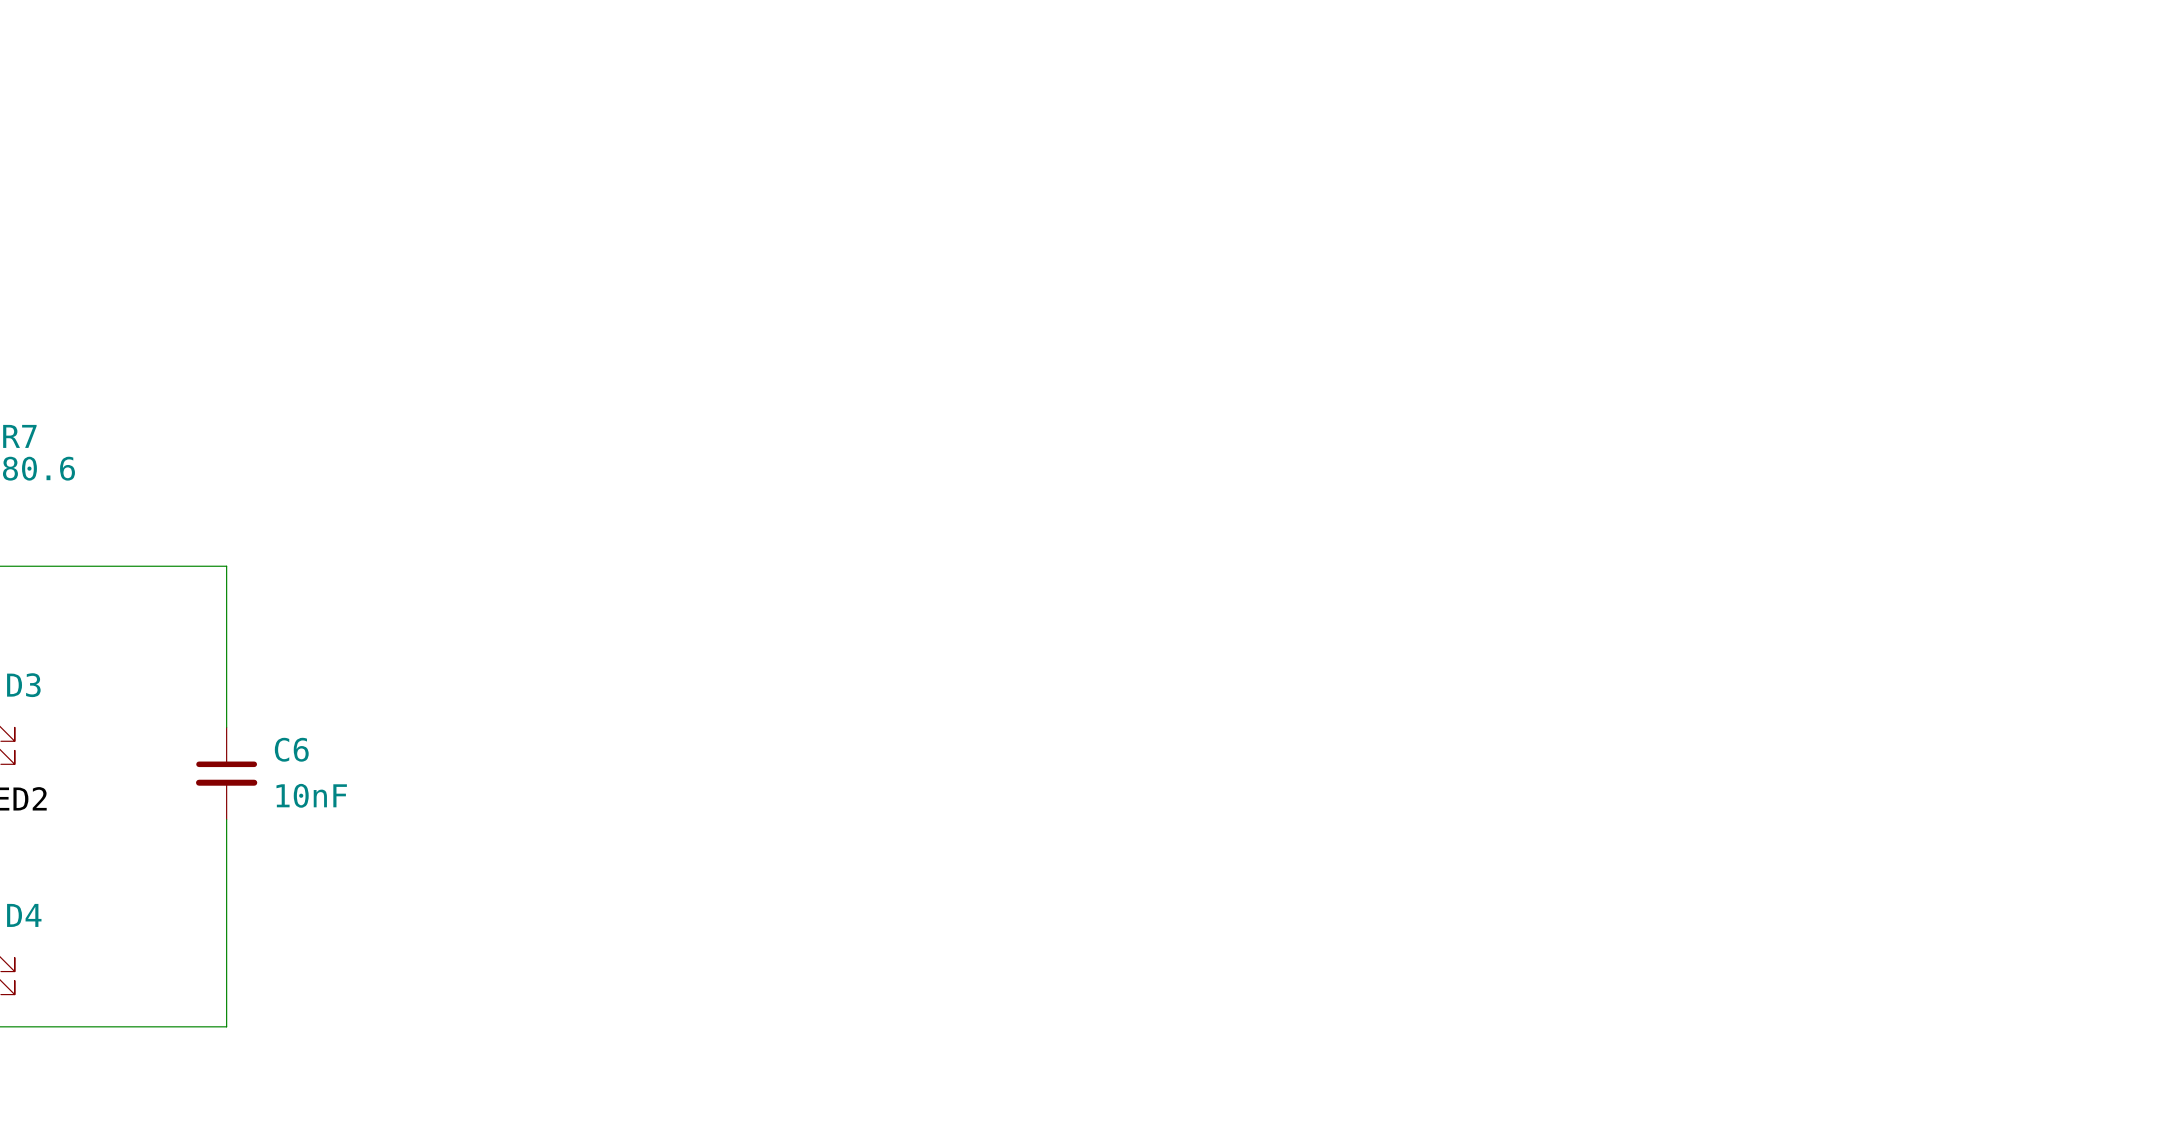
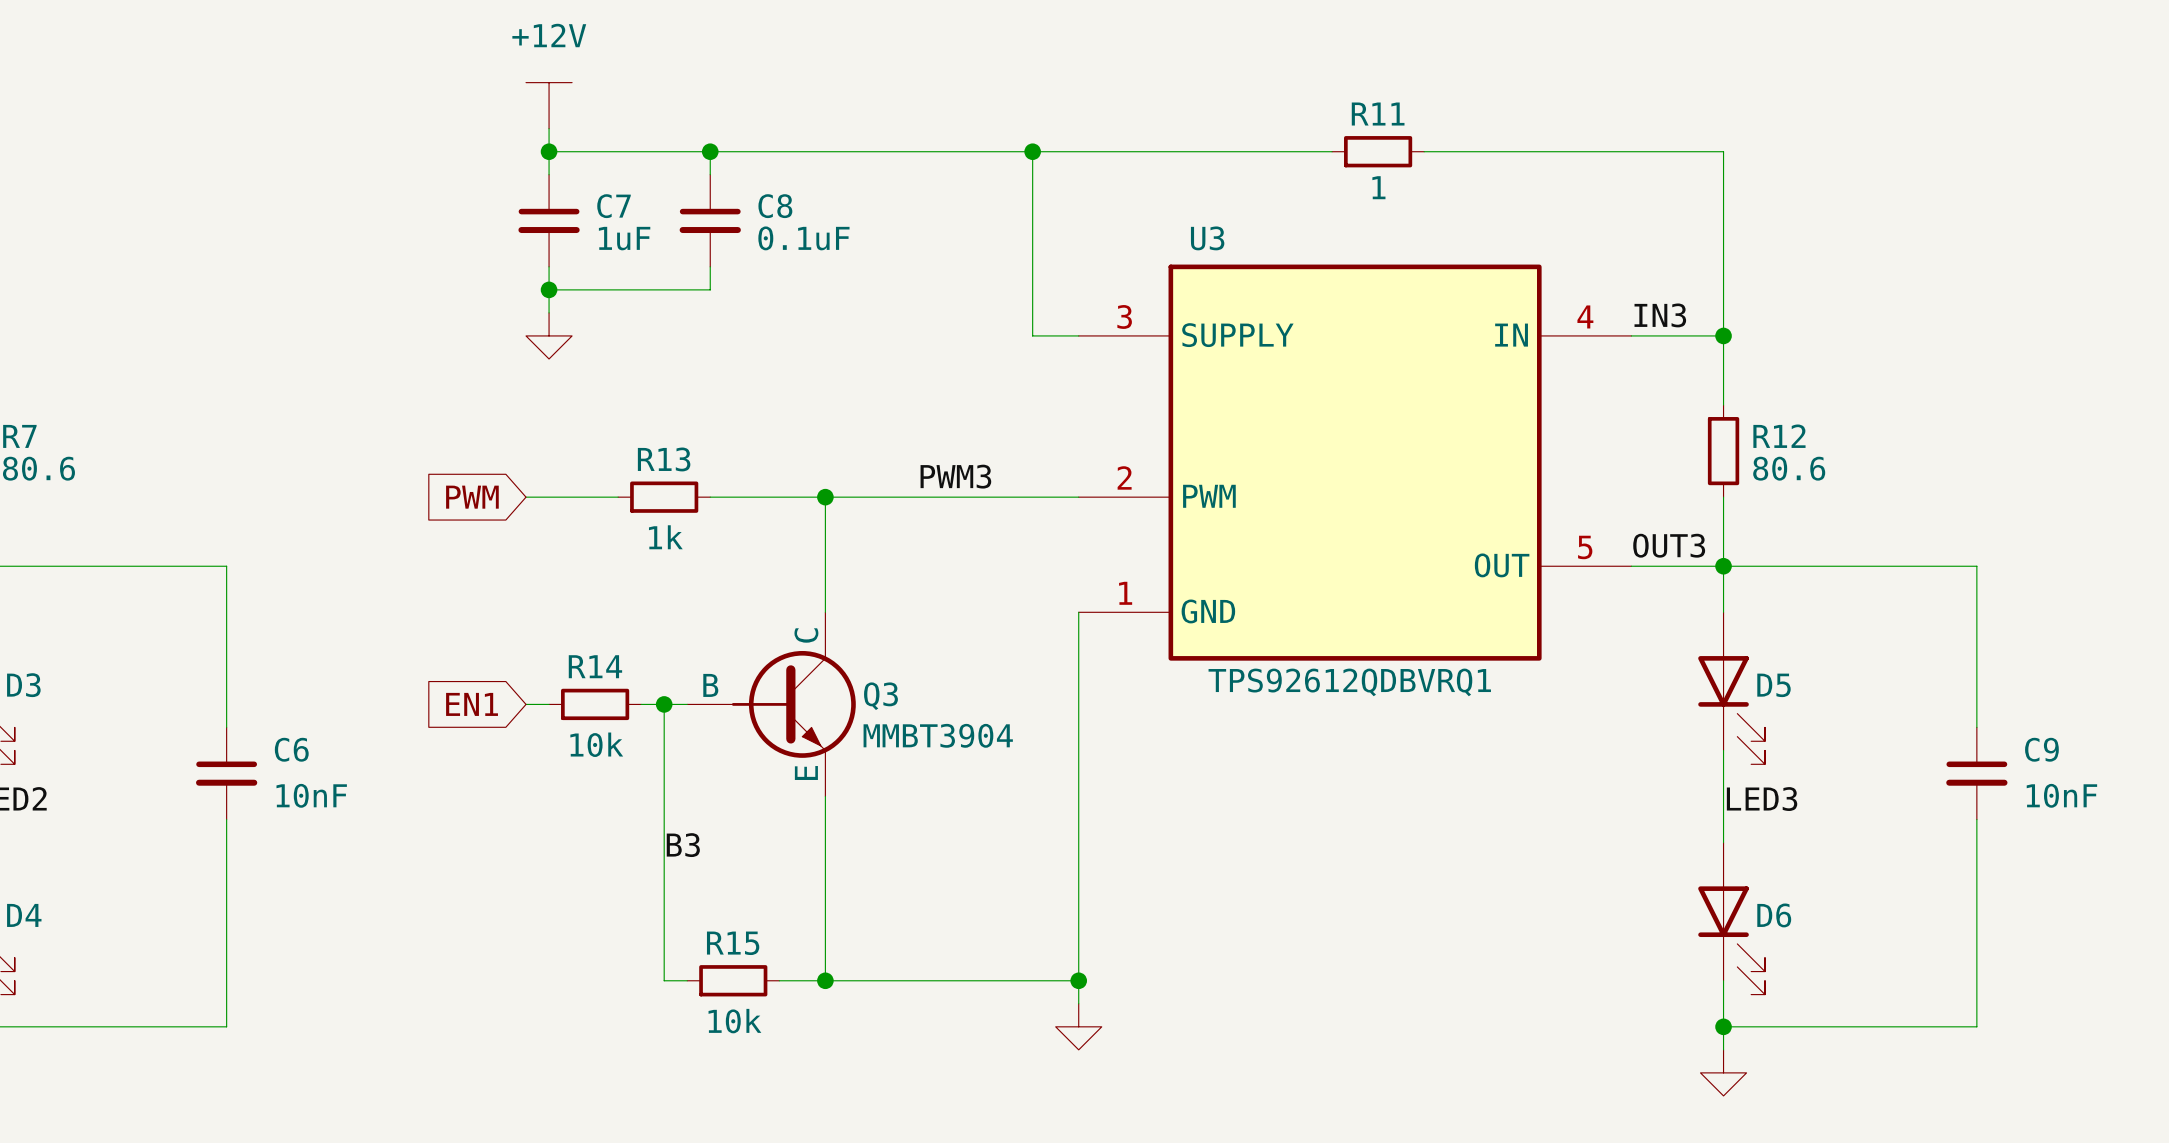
power symbol: none -> +12V (549, 105)
wire: none -> (549, 128) (549, 174)
wire: none -> (549, 151) (1332, 151)
junction: none -> (549, 151)
wire: none -> (710, 151) (710, 174)
junction: none -> (710, 151)
wire: none -> (1032, 151) (1032, 335) (1078, 335)
junction: none -> (1032, 151)
R11: none -> 1 (1378, 151)
wire: none -> (1424, 151) (1723, 151) (1723, 405)
C7: none -> 1uF (549, 220)
C8: none -> 0.1uF (710, 220)
wire: none -> (549, 266) (549, 312)
wire: none -> (710, 266) (710, 289) (549, 289)
junction: none -> (549, 289)
label: none -> IN3 (1660, 315)
power symbol: none -> (549, 335)
wire: none -> (1631, 335) (1723, 335)
junction: none -> (1723, 335)
R12: none -> 80.6 (1723, 451)
U3: none -> TPS92612QDBVRQ1 (1355, 462)
label: none -> PWM3 (955, 476)
global label: none -> PWM (472, 497)
wire: none -> (526, 497) (618, 497)
R13: none -> 1k (664, 497)
wire: none -> (710, 497) (1078, 497)
wire: none -> (825, 497) (825, 612)
junction: none -> (825, 497)
wire: none -> (1723, 497) (1723, 612)
label: none -> OUT3 (1669, 545)
wire: none -> (1631, 566) (1976, 566) (1976, 727)
junction: none -> (1723, 566)
wire: none -> (1078, 612) (1078, 1003)
D5: none -> (1731, 688)
global label: none -> EN1 (472, 704)
wire: none -> (526, 704) (549, 704)
R14: none -> 10k (595, 704)
wire: none -> (641, 704) (687, 704)
wire: none -> (664, 704) (664, 980) (687, 980)
junction: none -> (664, 704)
Q3: none -> MMBT3904 (771, 704)
wire: none -> (1723, 750) (1723, 842)
C9: none -> 10nF (1976, 773)
wire: none -> (825, 796) (825, 980)
label: none -> LED3 (1762, 799)
wire: none -> (1976, 819) (1976, 1026) (1723, 1026)
label: none -> B3 (683, 845)
D6: none -> (1731, 918)
R15: none -> 10k (733, 980)
wire: none -> (779, 980) (1078, 980)
junction: none -> (825, 980)
junction: none -> (1078, 980)
wire: none -> (1723, 980) (1723, 1049)
power symbol: none -> (1078, 1026)
junction: none -> (1723, 1026)
power symbol: none -> (1723, 1072)

